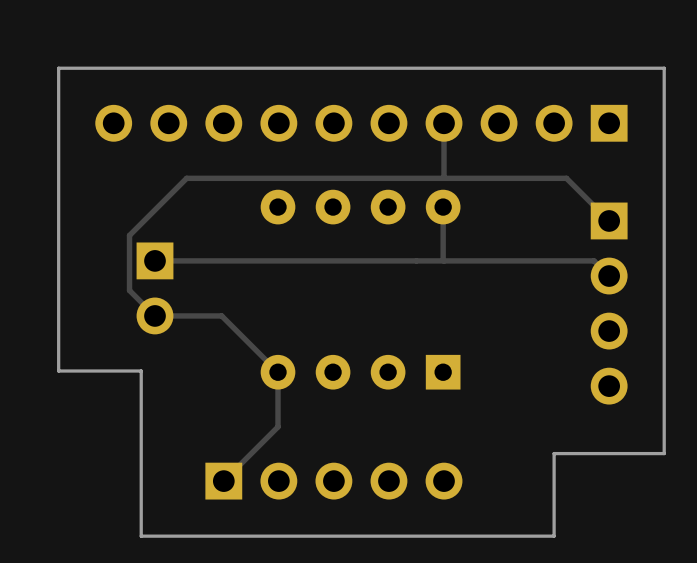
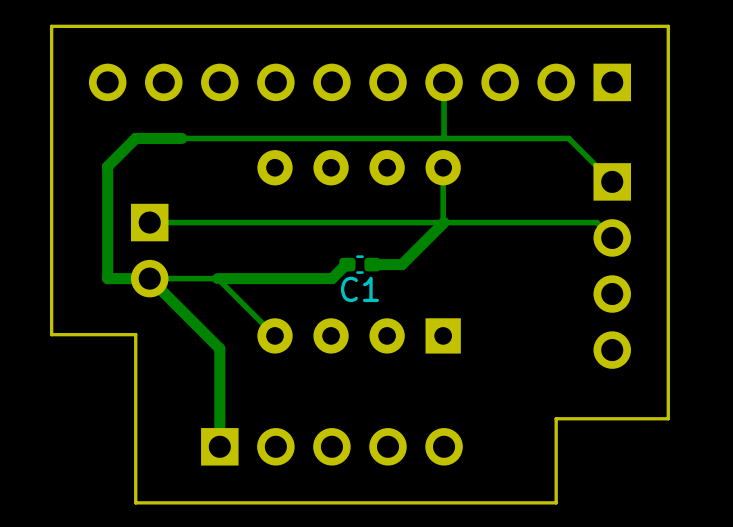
track: (186, 178) (129, 235) (129, 290) (154, 315) -> (181, 138) (135, 138) (107, 166) (107, 278) (149, 278) (219, 348) (219, 446)
track: none -> (444, 222) (402, 264) (373, 264)
track: none -> (346, 264) (332, 278) (217, 278)
C1: none -> (359, 264)
track: (278, 372) (278, 426) (223, 481) -> none

